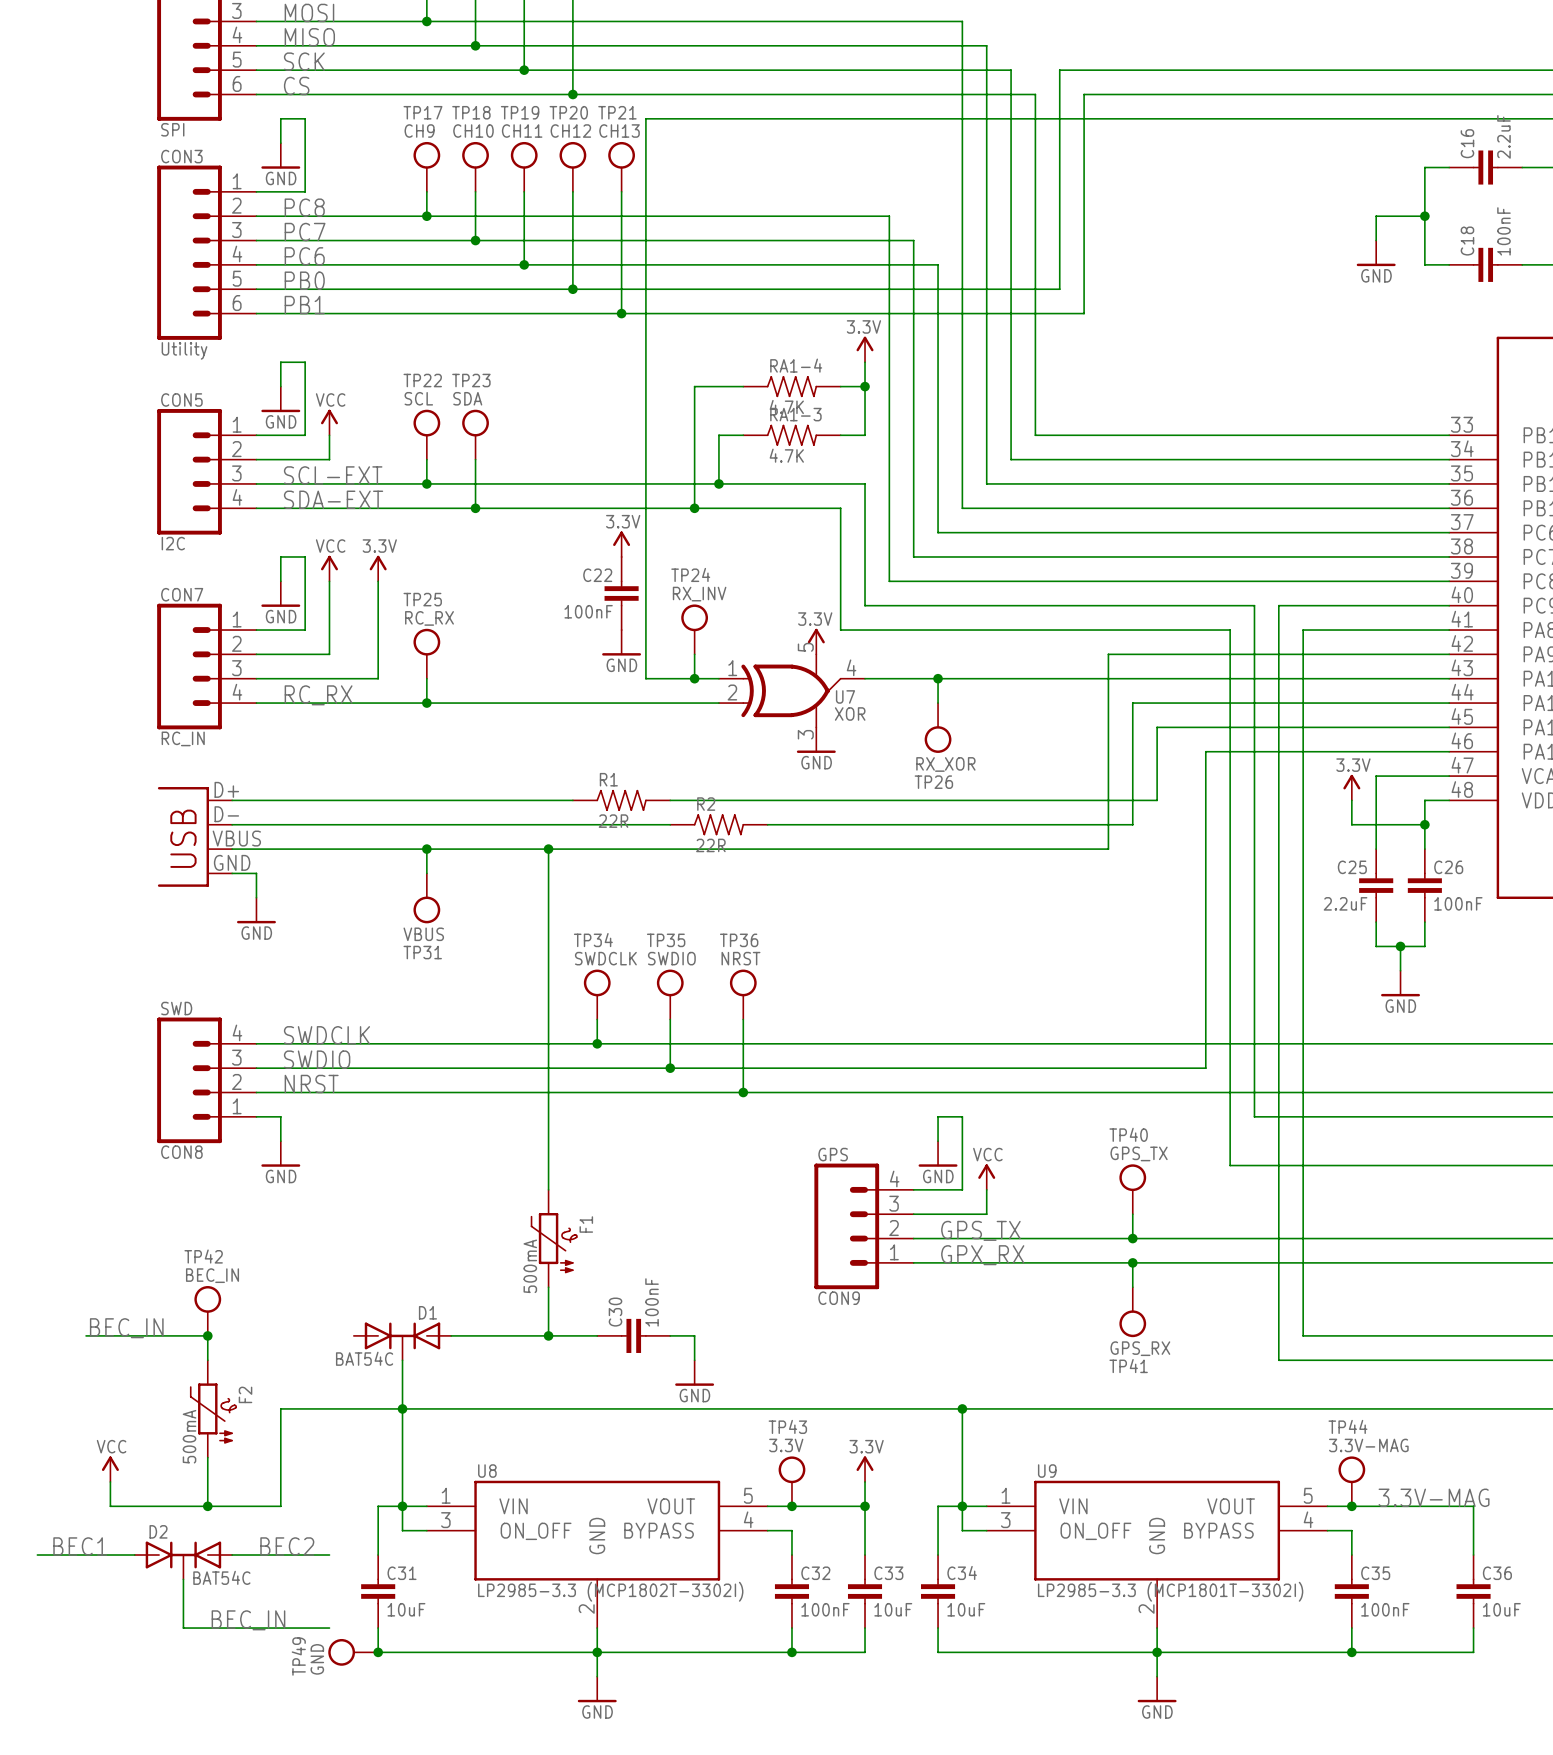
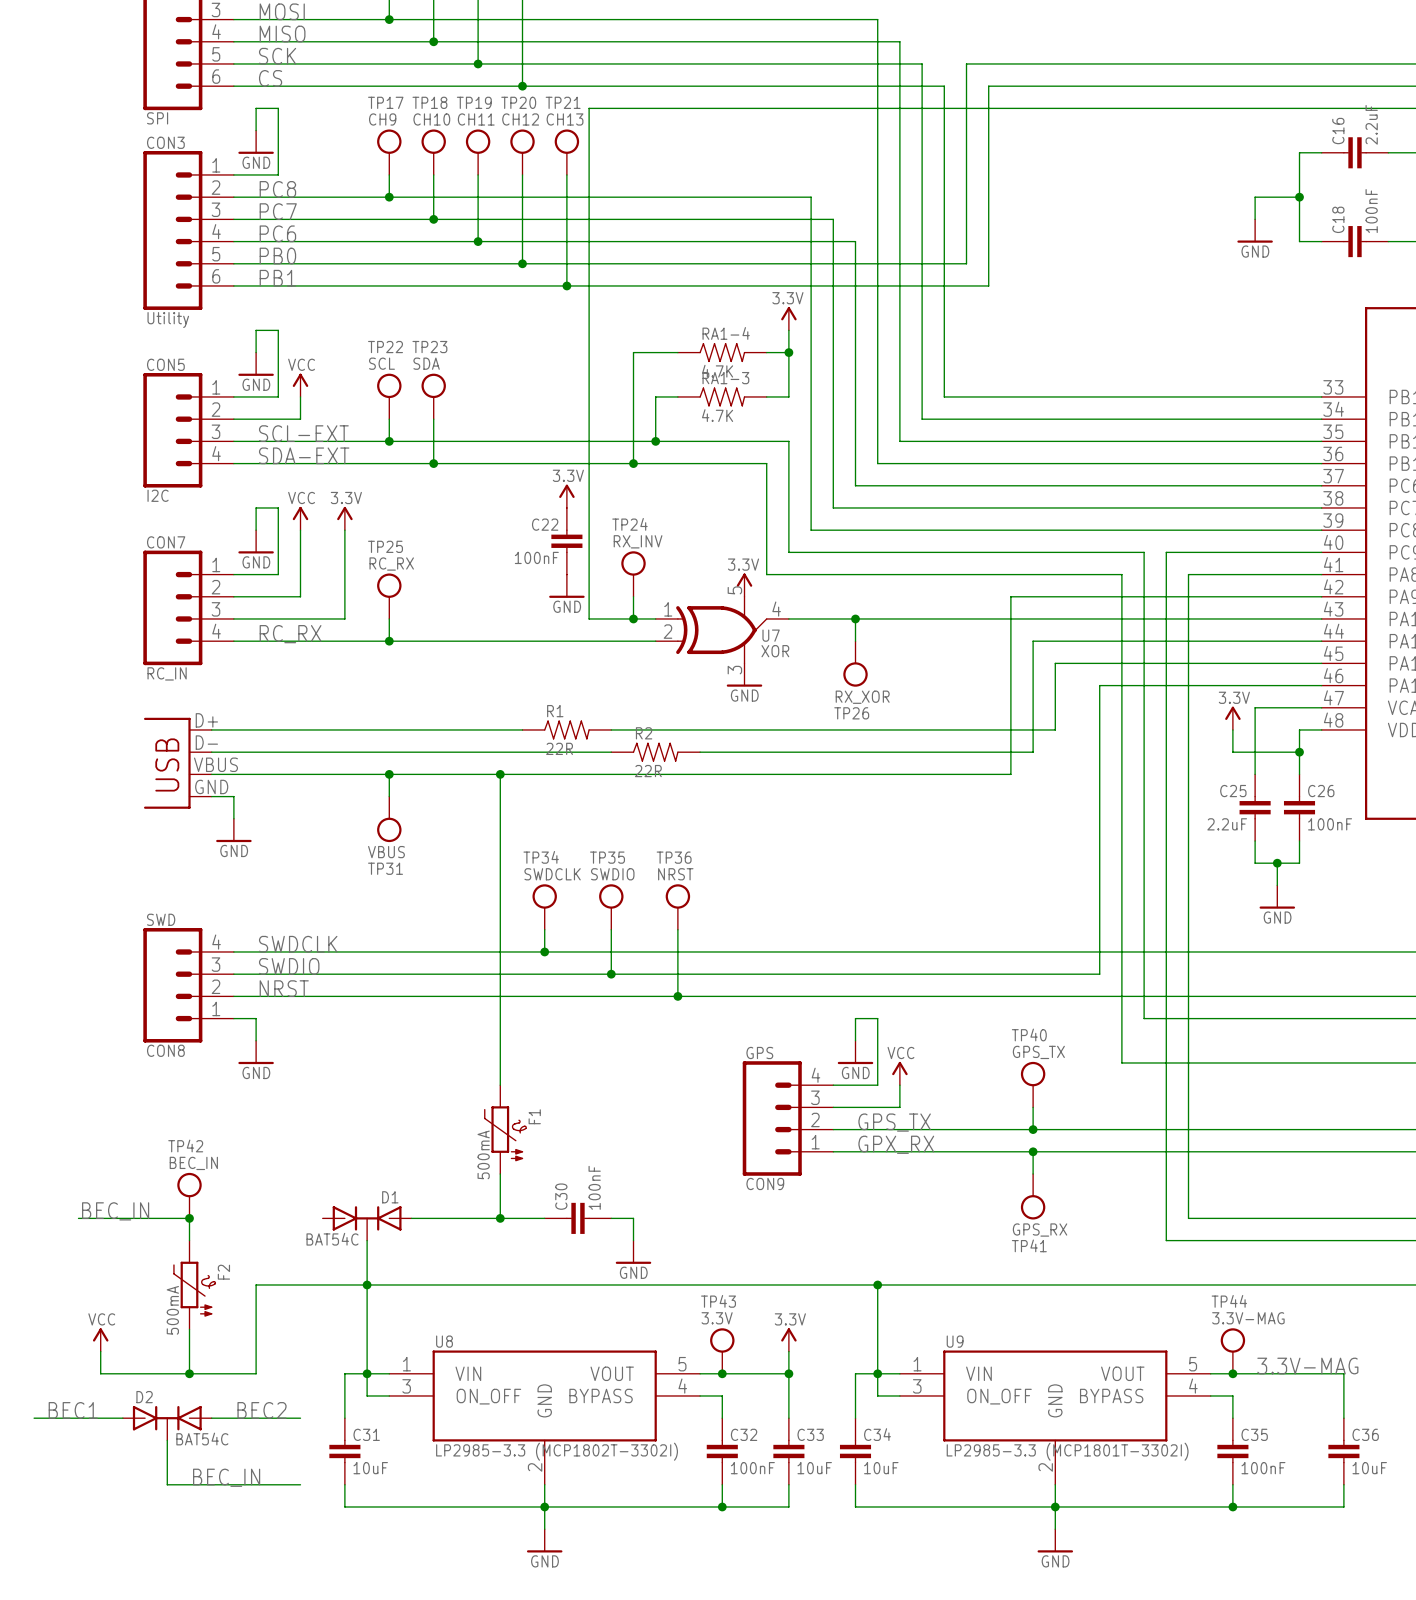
TP49: GND (353, 1652) -> none
junction: (378, 1652) -> none

